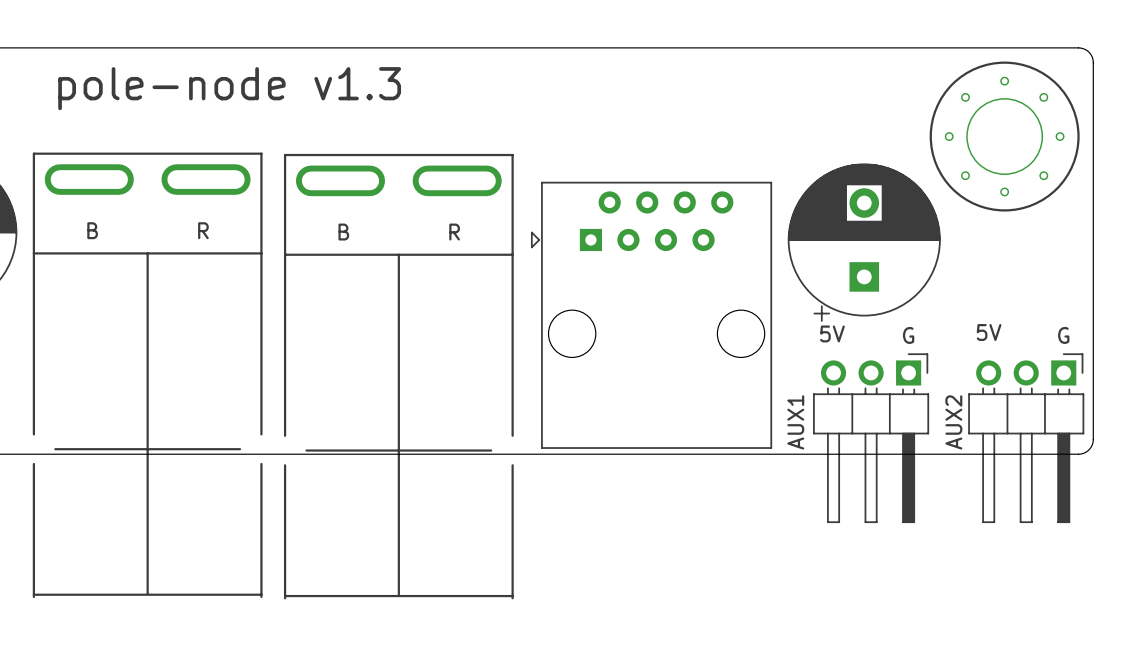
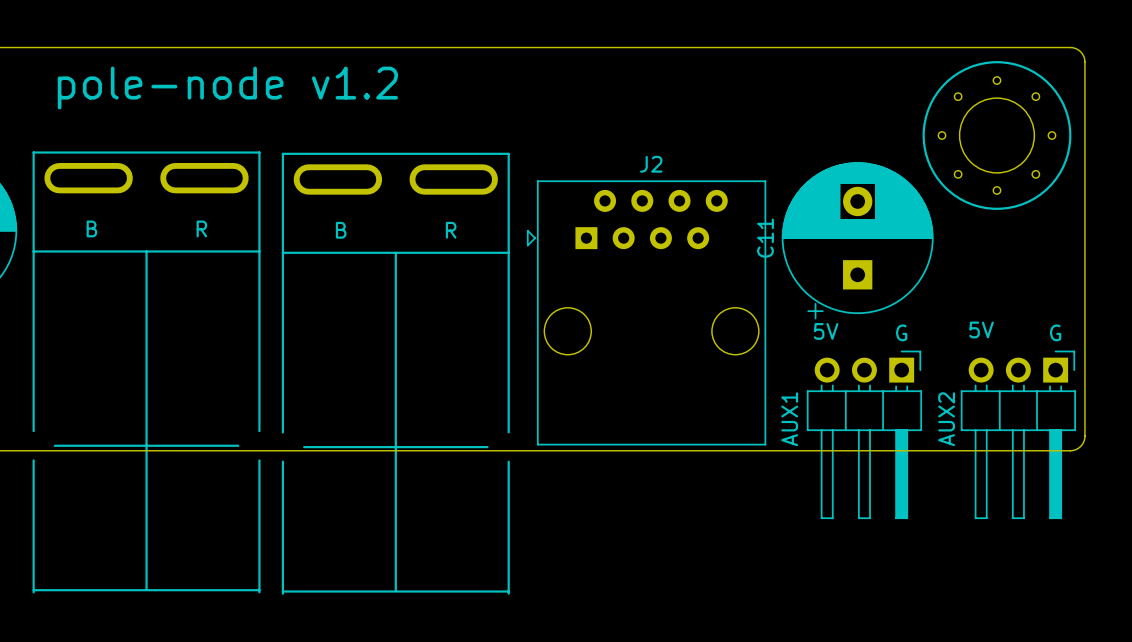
text: pole-node v1.3 (229, 88) -> pole-node v1.2 (227, 87)
J2 name: none -> J2 (651, 164)
C11 name: none -> C11 (765, 238)

